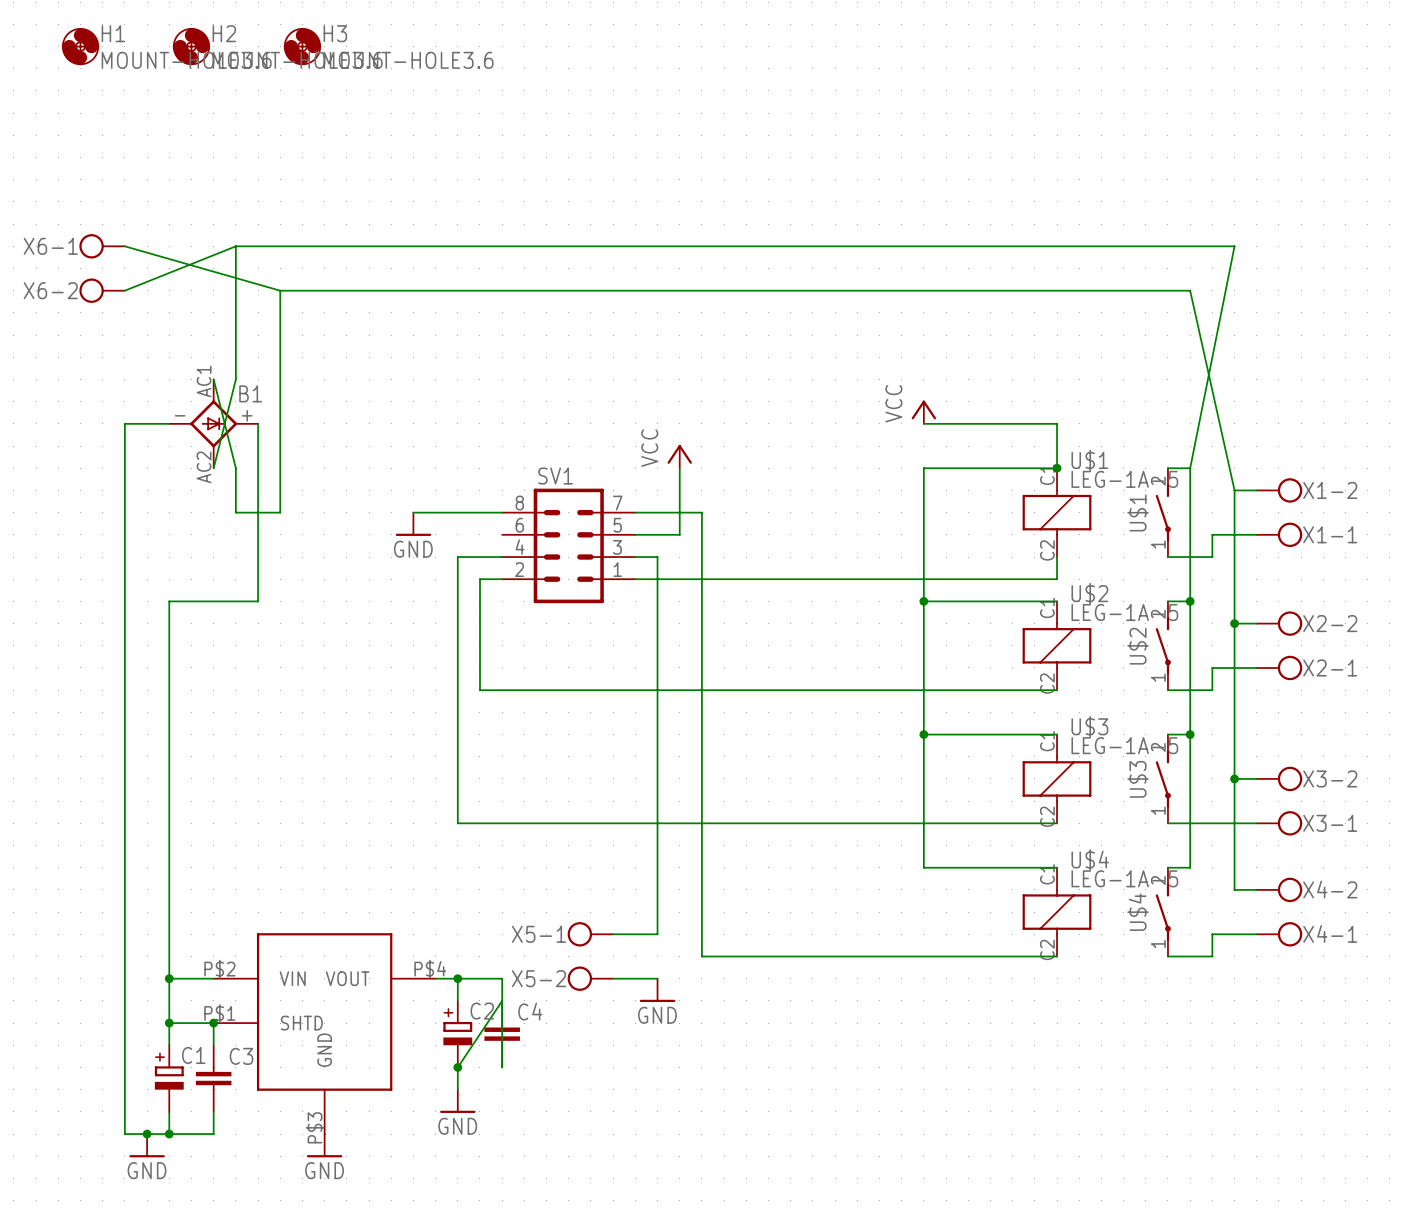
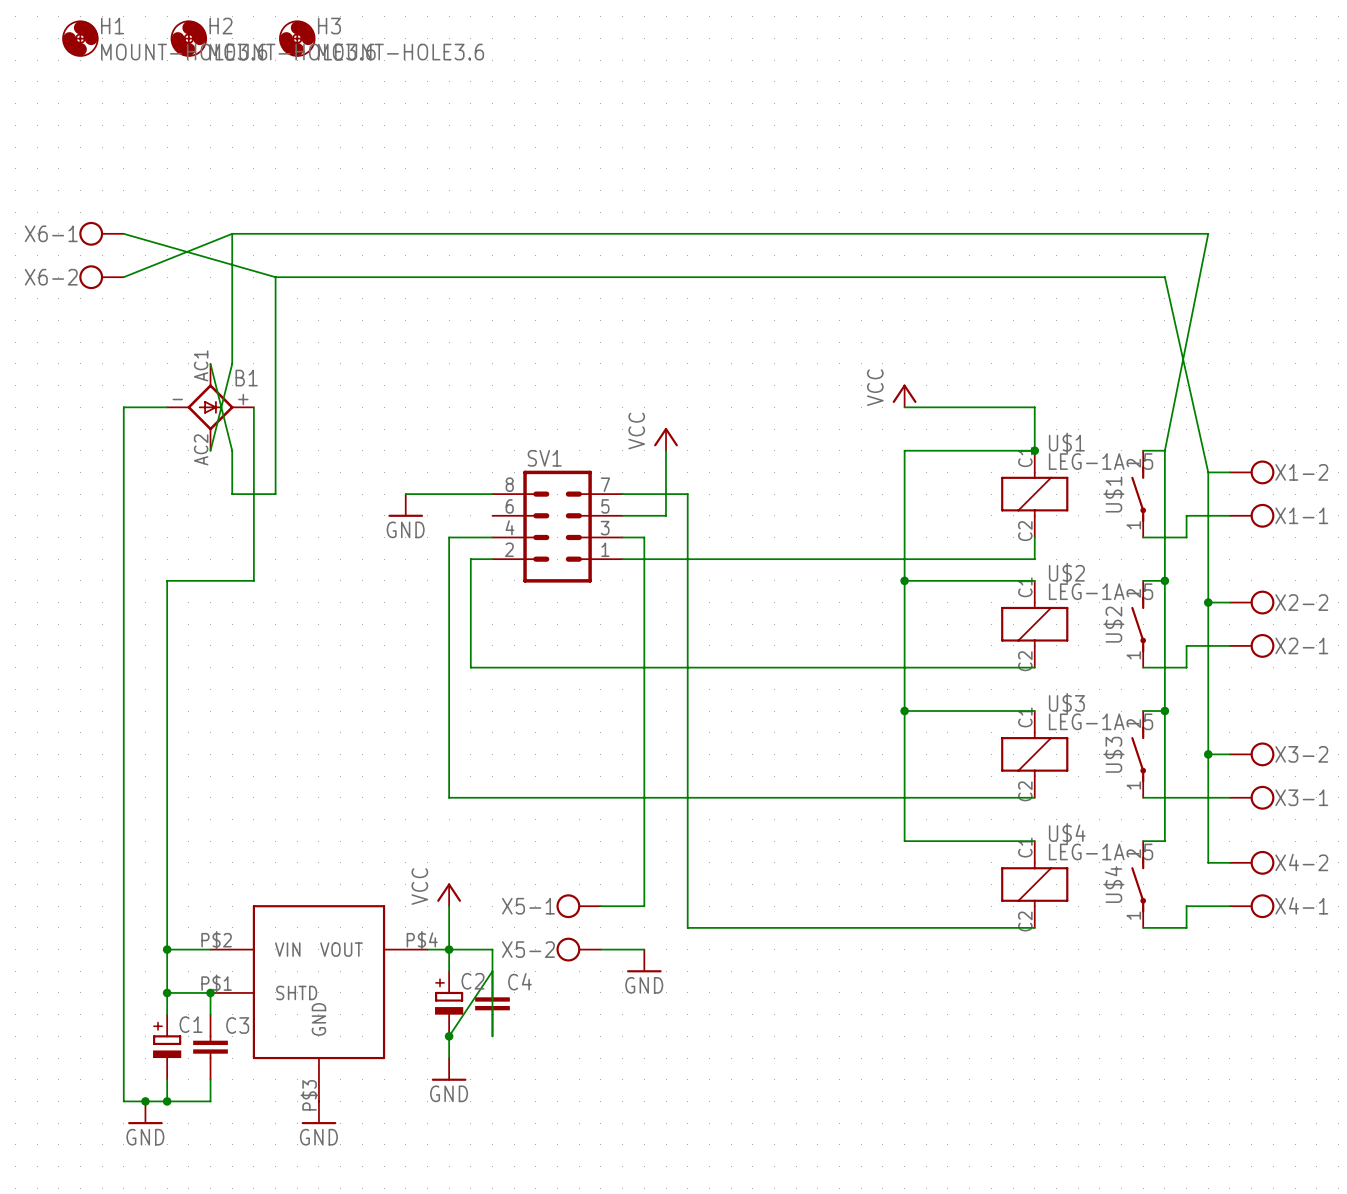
power symbol: none -> VCC (449, 894)
wire: none -> (449, 906) (449, 949)

